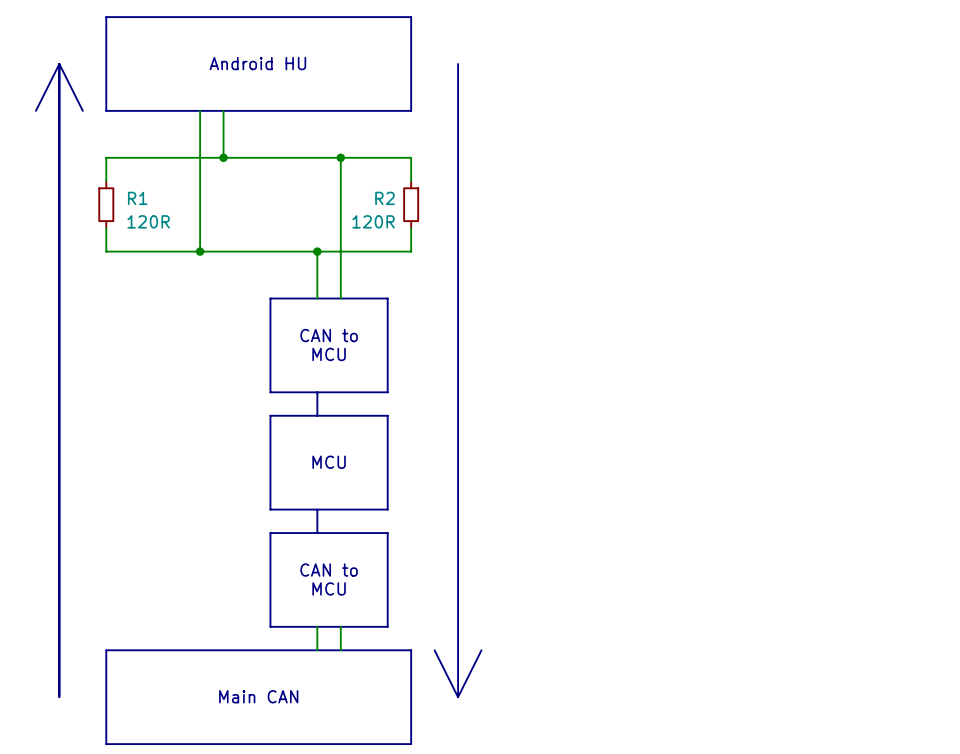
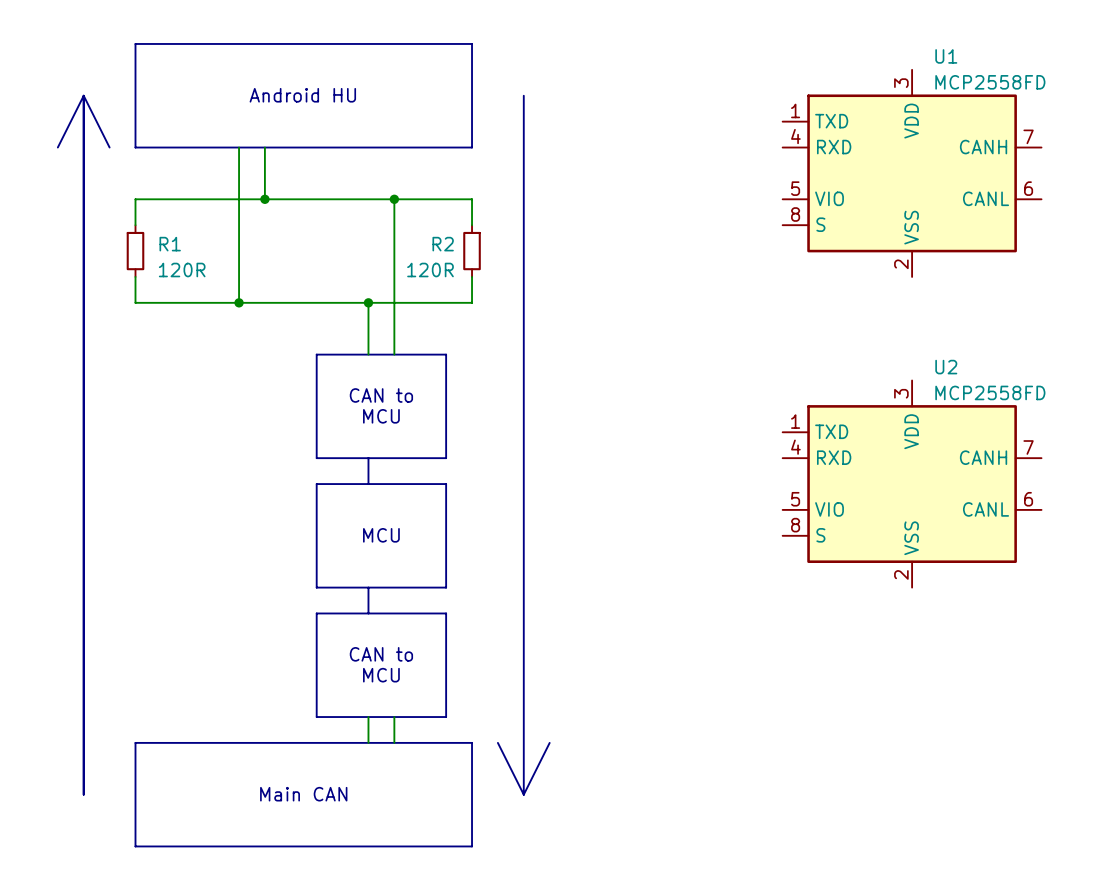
U1: none -> MCP2558FD (912, 173)
U2: none -> MCP2558FD (912, 484)

